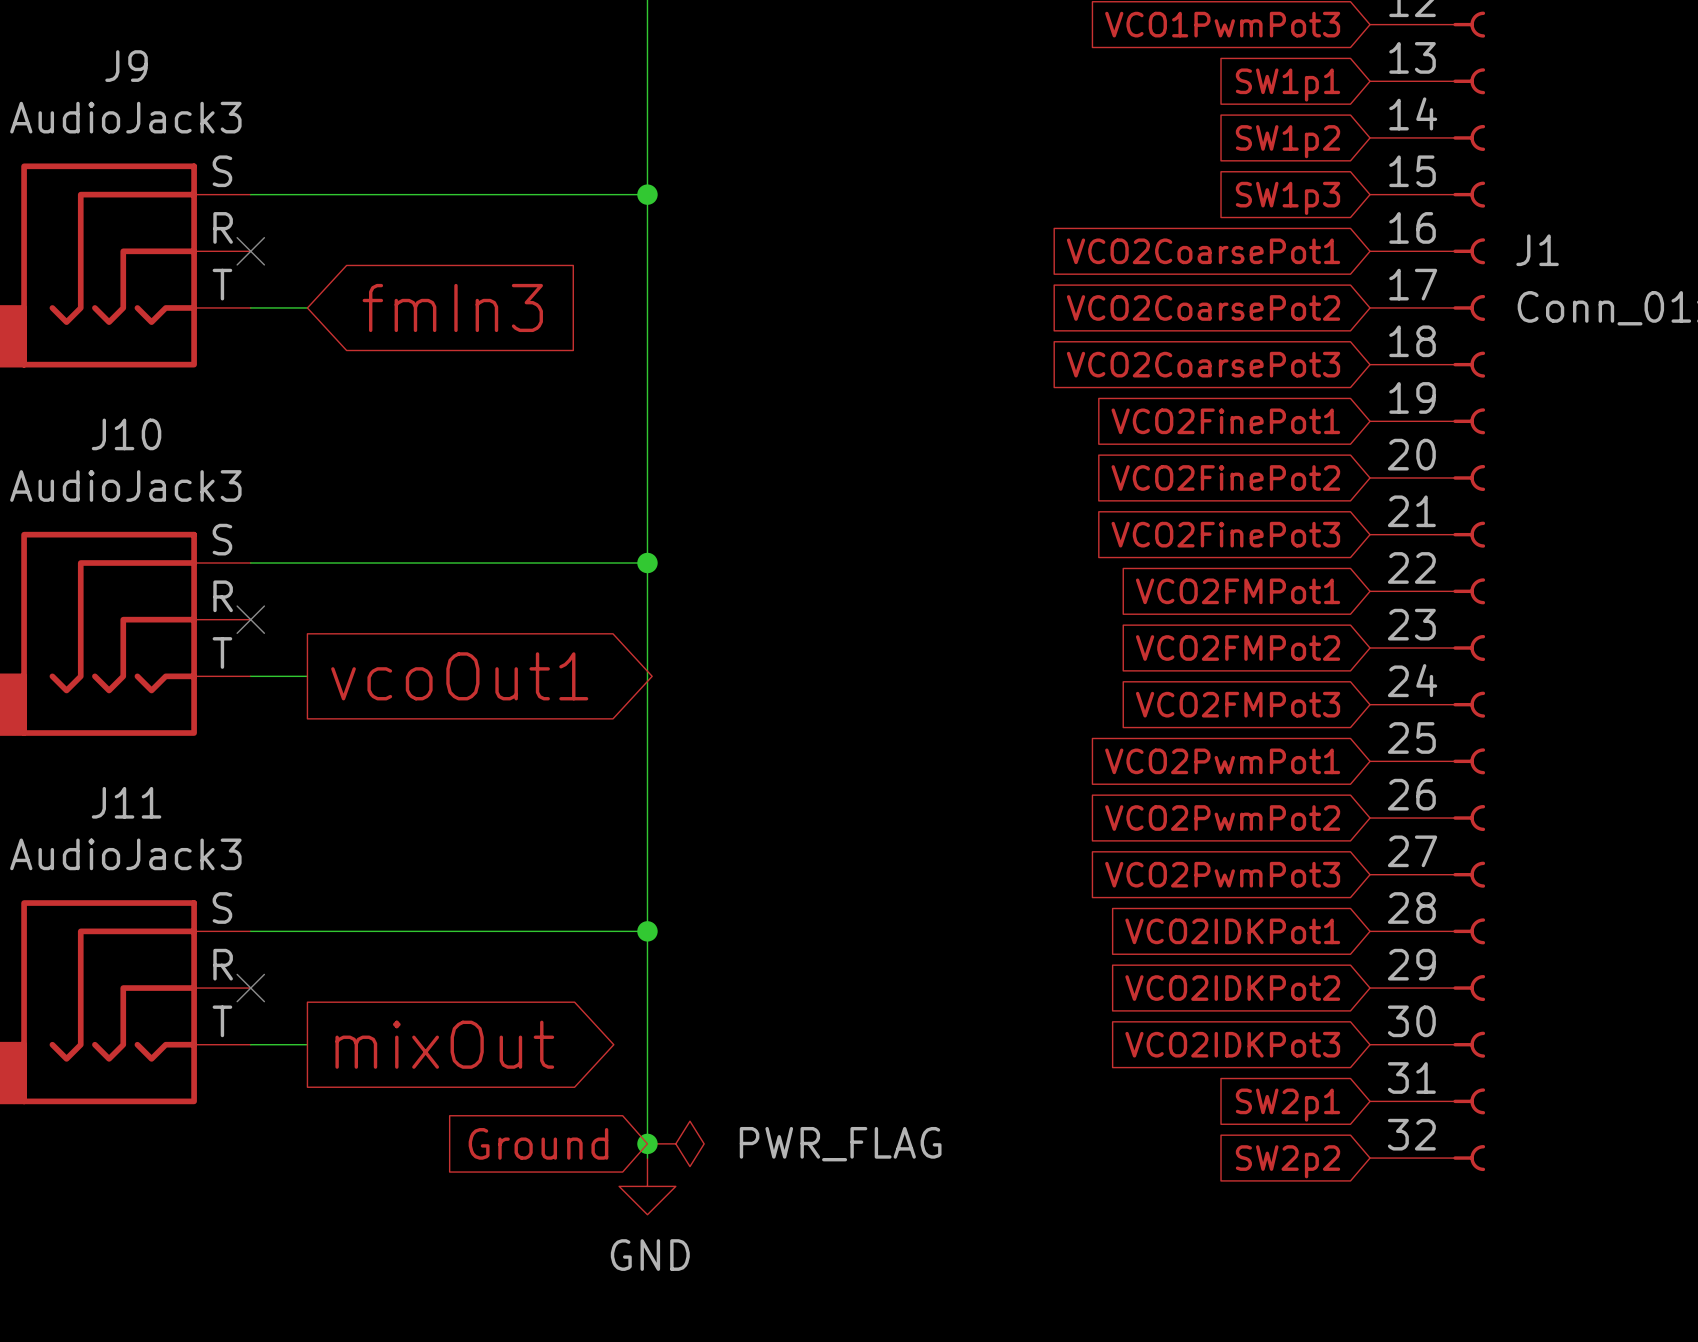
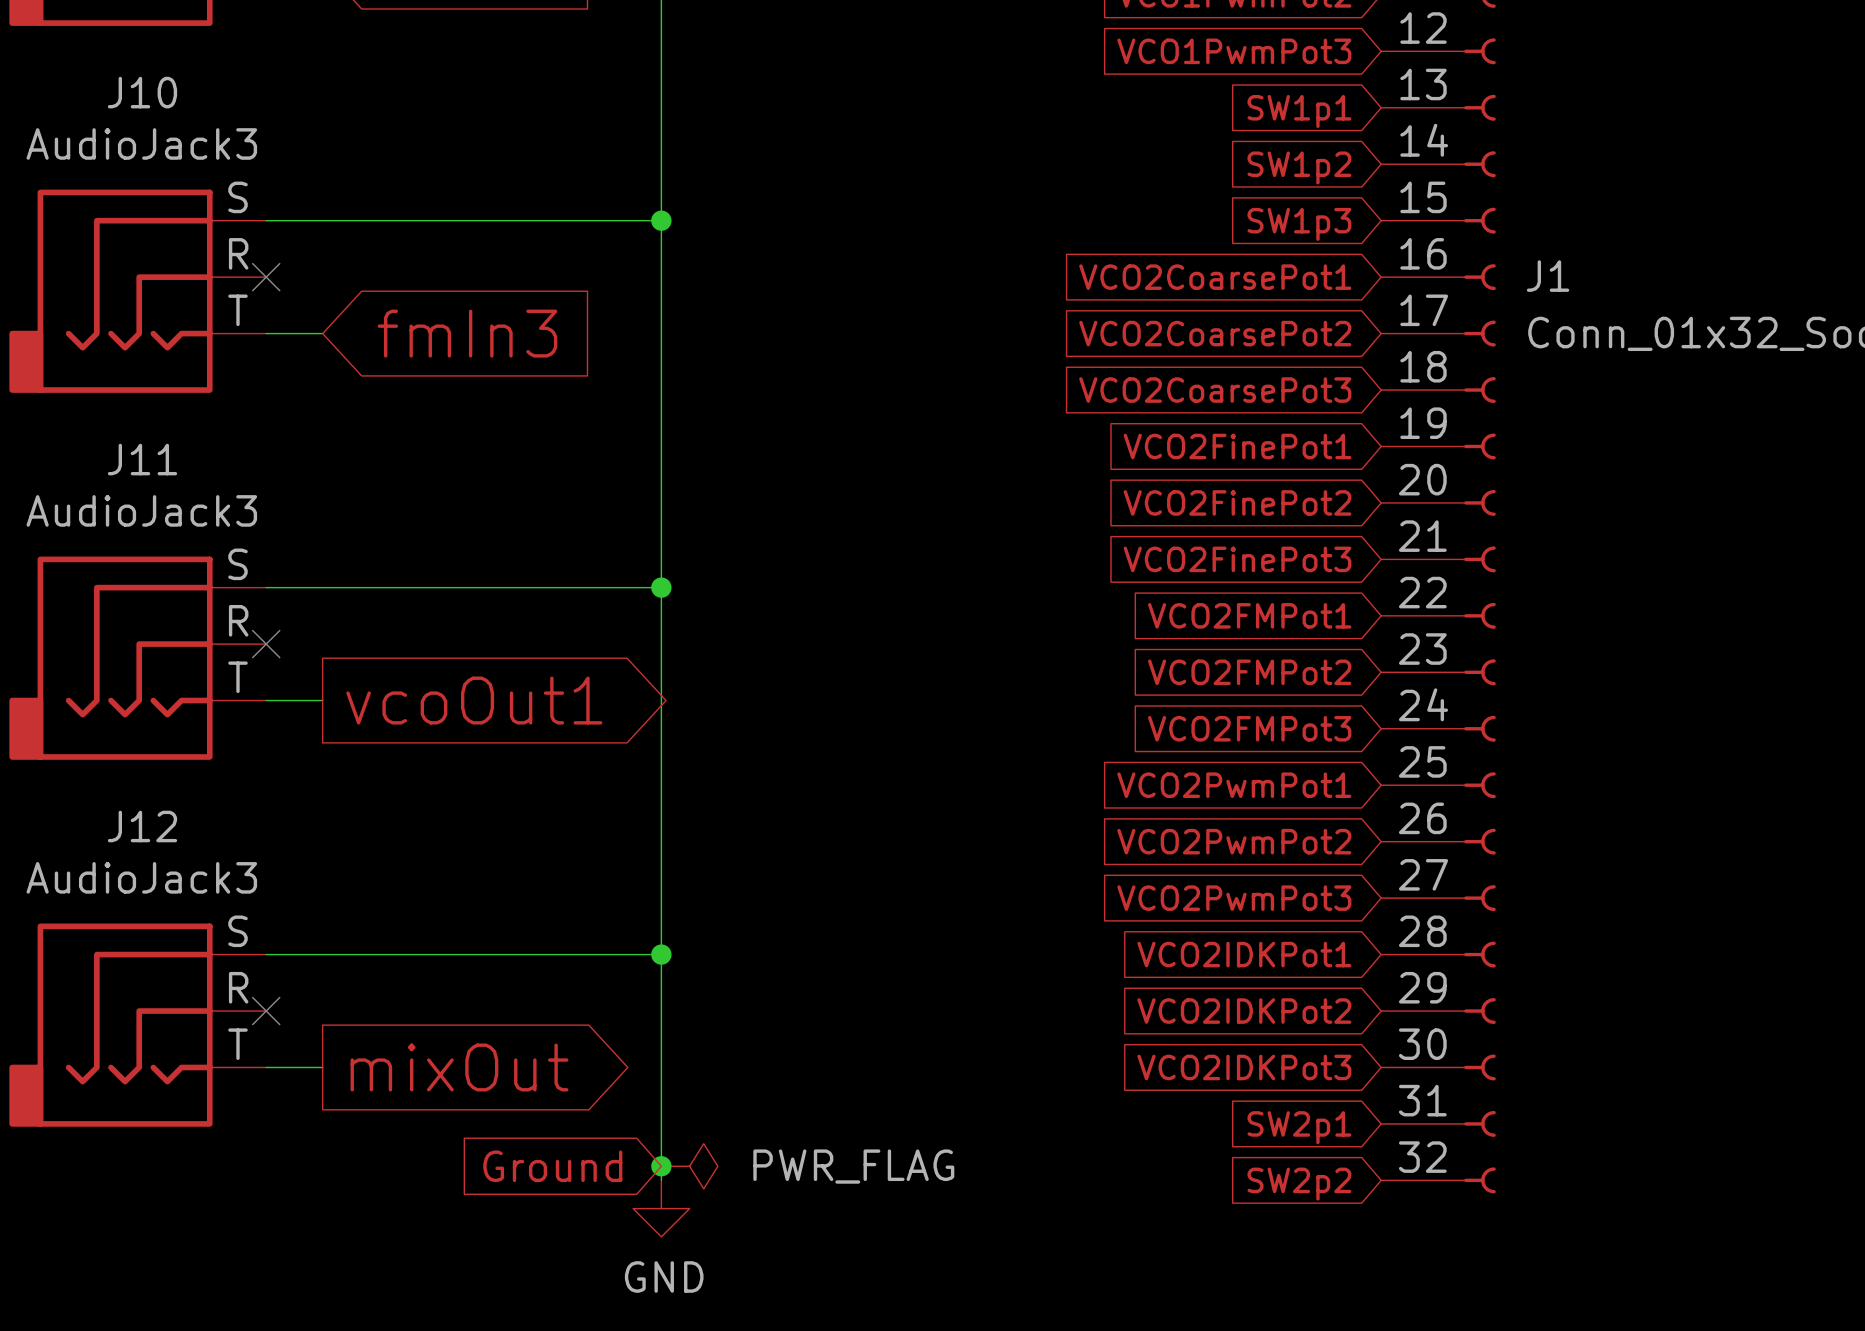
J9 name: J9 (126, 66) -> J10 (142, 92)
J10 name: J10 (126, 434) -> J11 (142, 459)
J11 name: J11 (126, 802) -> J12 (142, 826)

